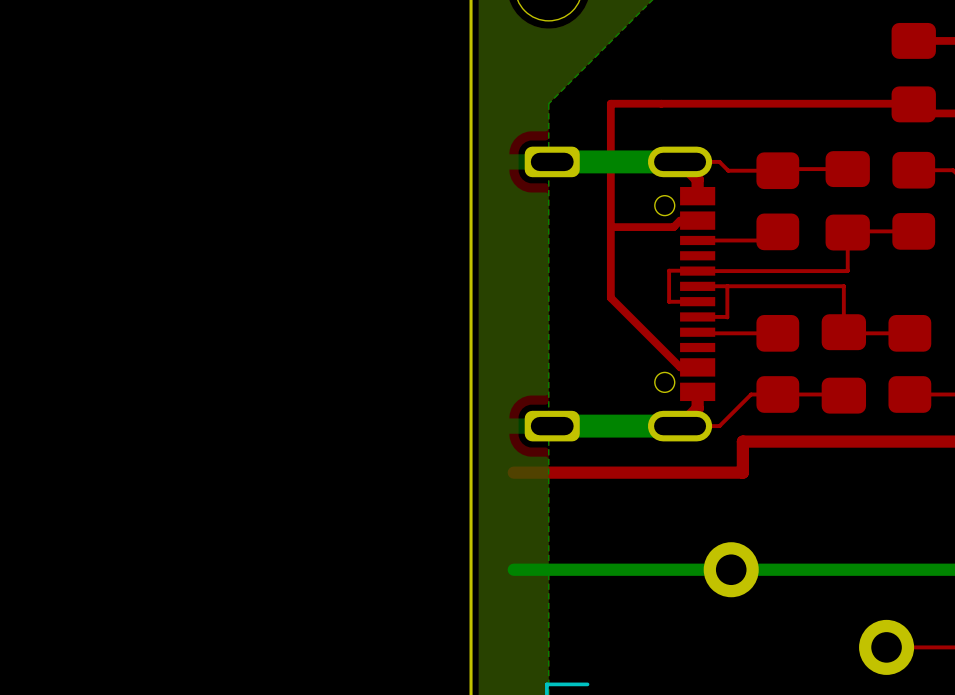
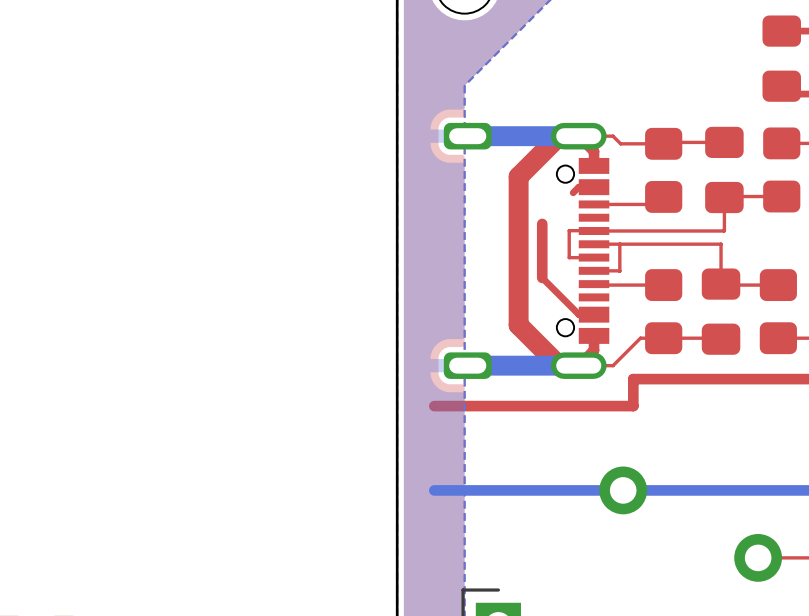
top track: (913, 104) (610, 103) (610, 208) -> (559, 136) (518, 176)
top track width: thin (610, 208) (610, 297) -> thick (518, 176) (518, 254)
top track: (673, 227) (610, 227) -> none
top track: (610, 297) (638, 325) -> (542, 223) (542, 277)
top track: none -> (518, 254) (518, 325) (559, 365)

